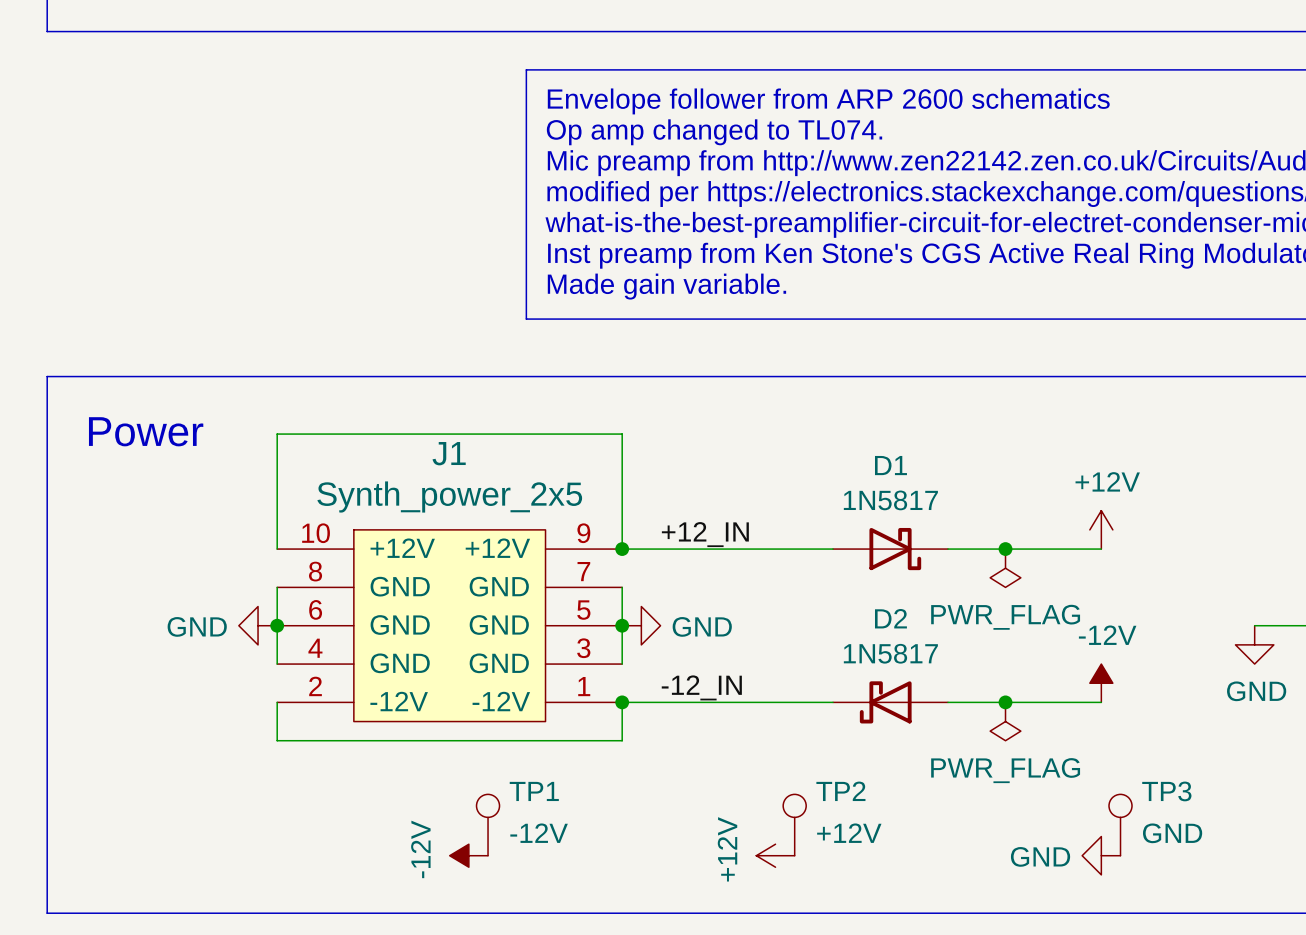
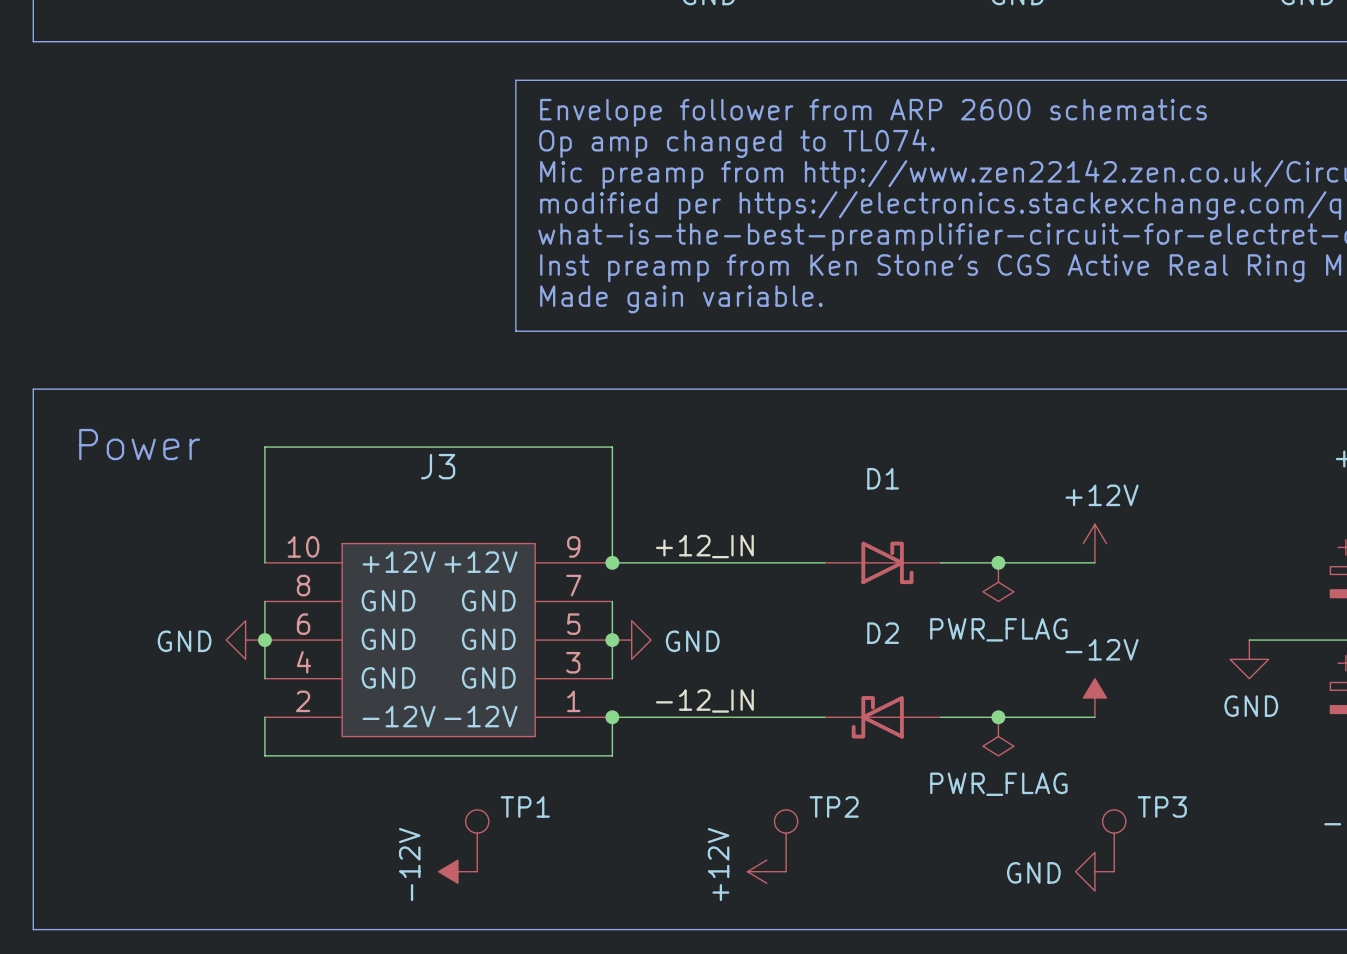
J1 name: J1 (449, 453) -> J3 (438, 466)
J1 value: Synth_power_2x5 (449, 497) -> none
D1 value: 1N5817 (890, 500) -> none
D2 value: 1N5817 (890, 653) -> none
TP1 value: -12V (539, 833) -> none
TP2 value: +12V (849, 833) -> none
TP3 value: GND (1172, 833) -> none

